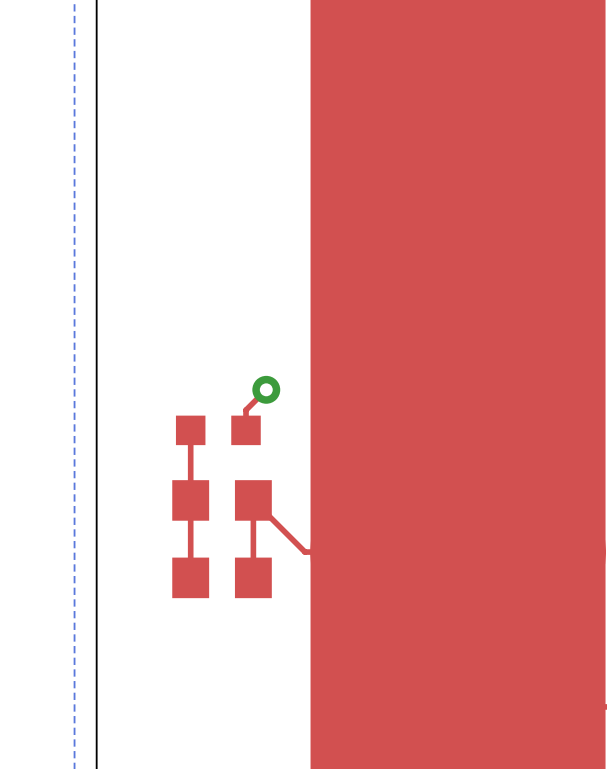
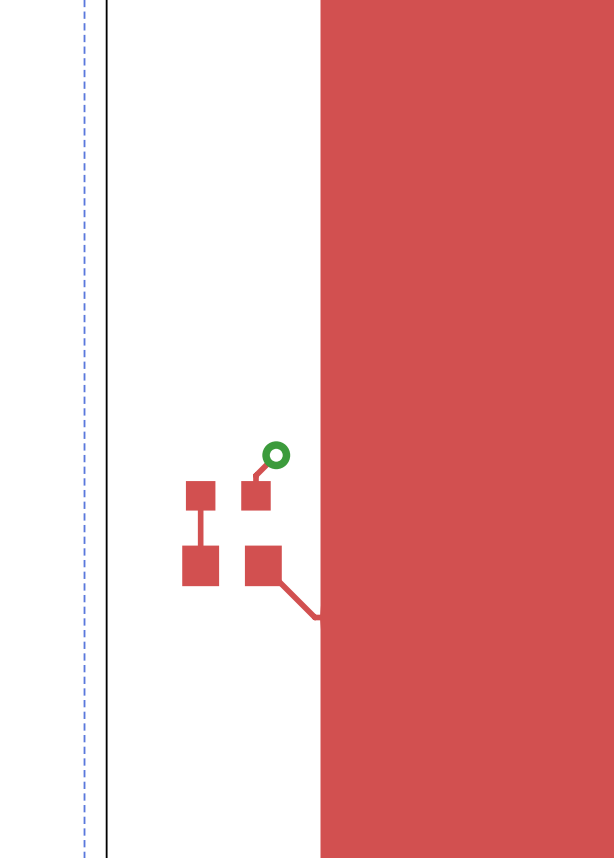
top track: (190, 500) (190, 577) -> none
top track: (253, 500) (253, 577) -> none
part: (222, 577) -> none

